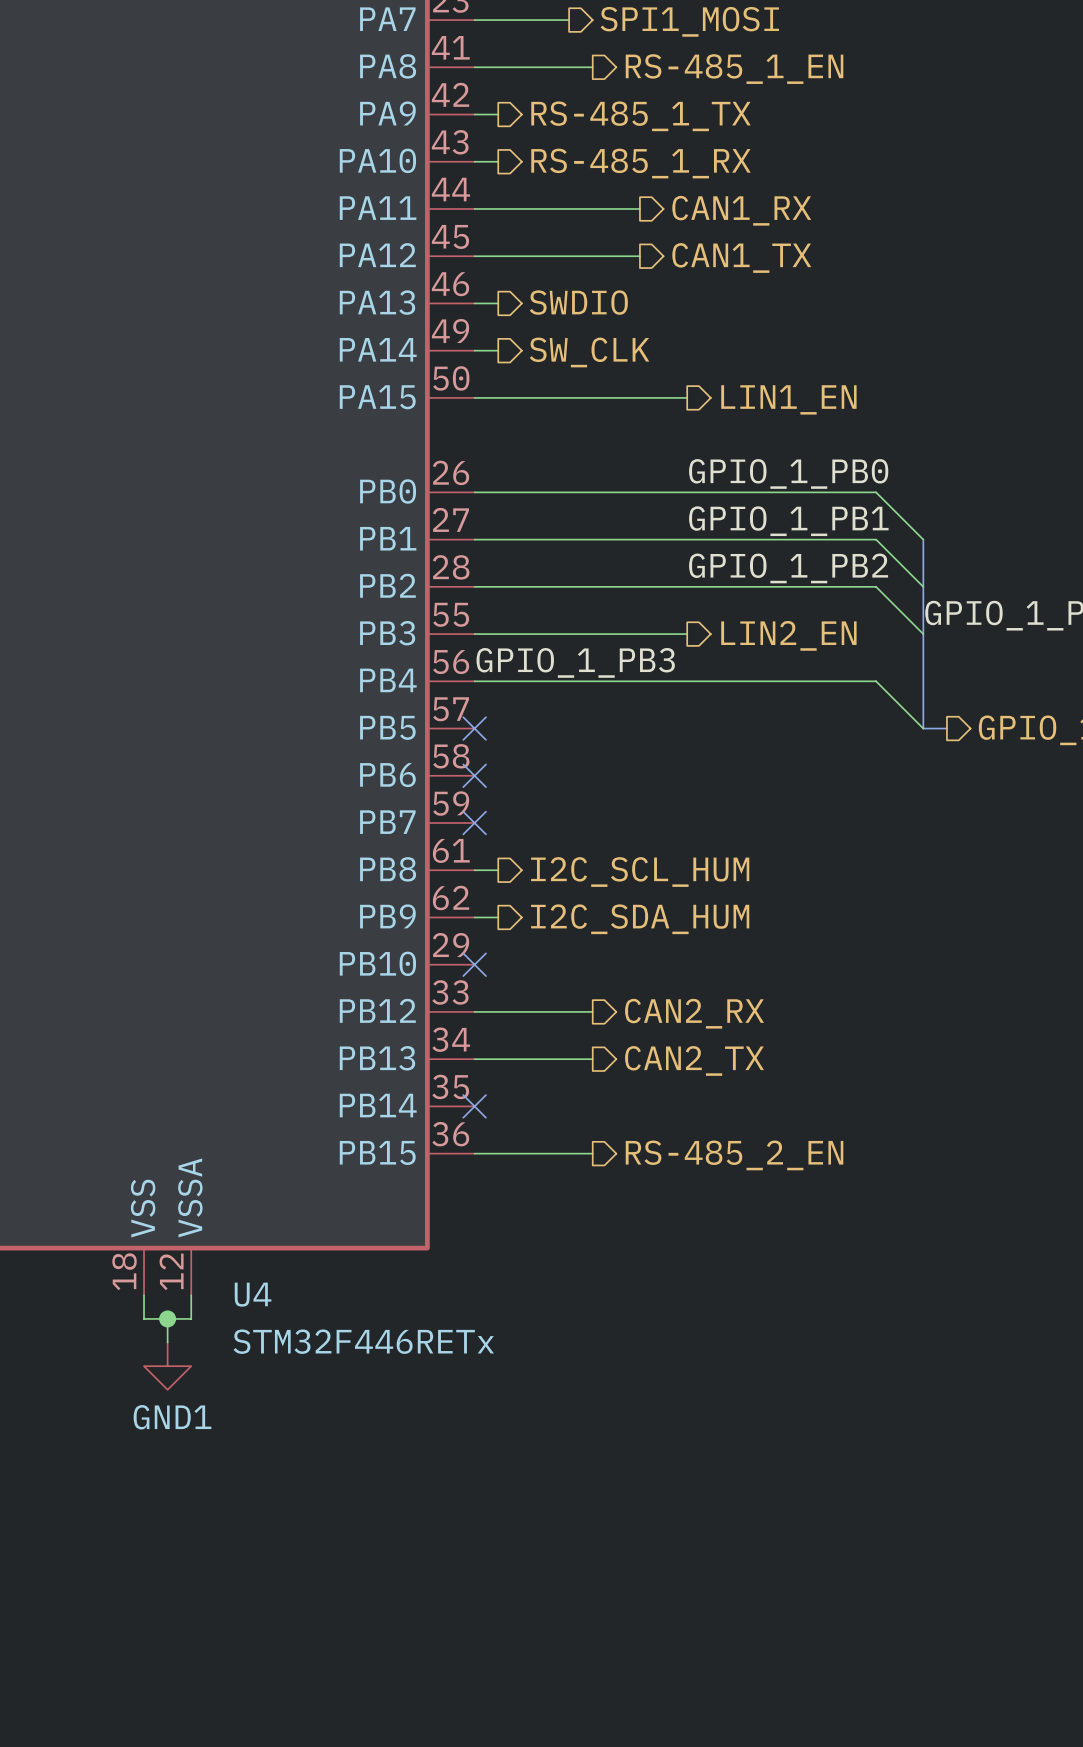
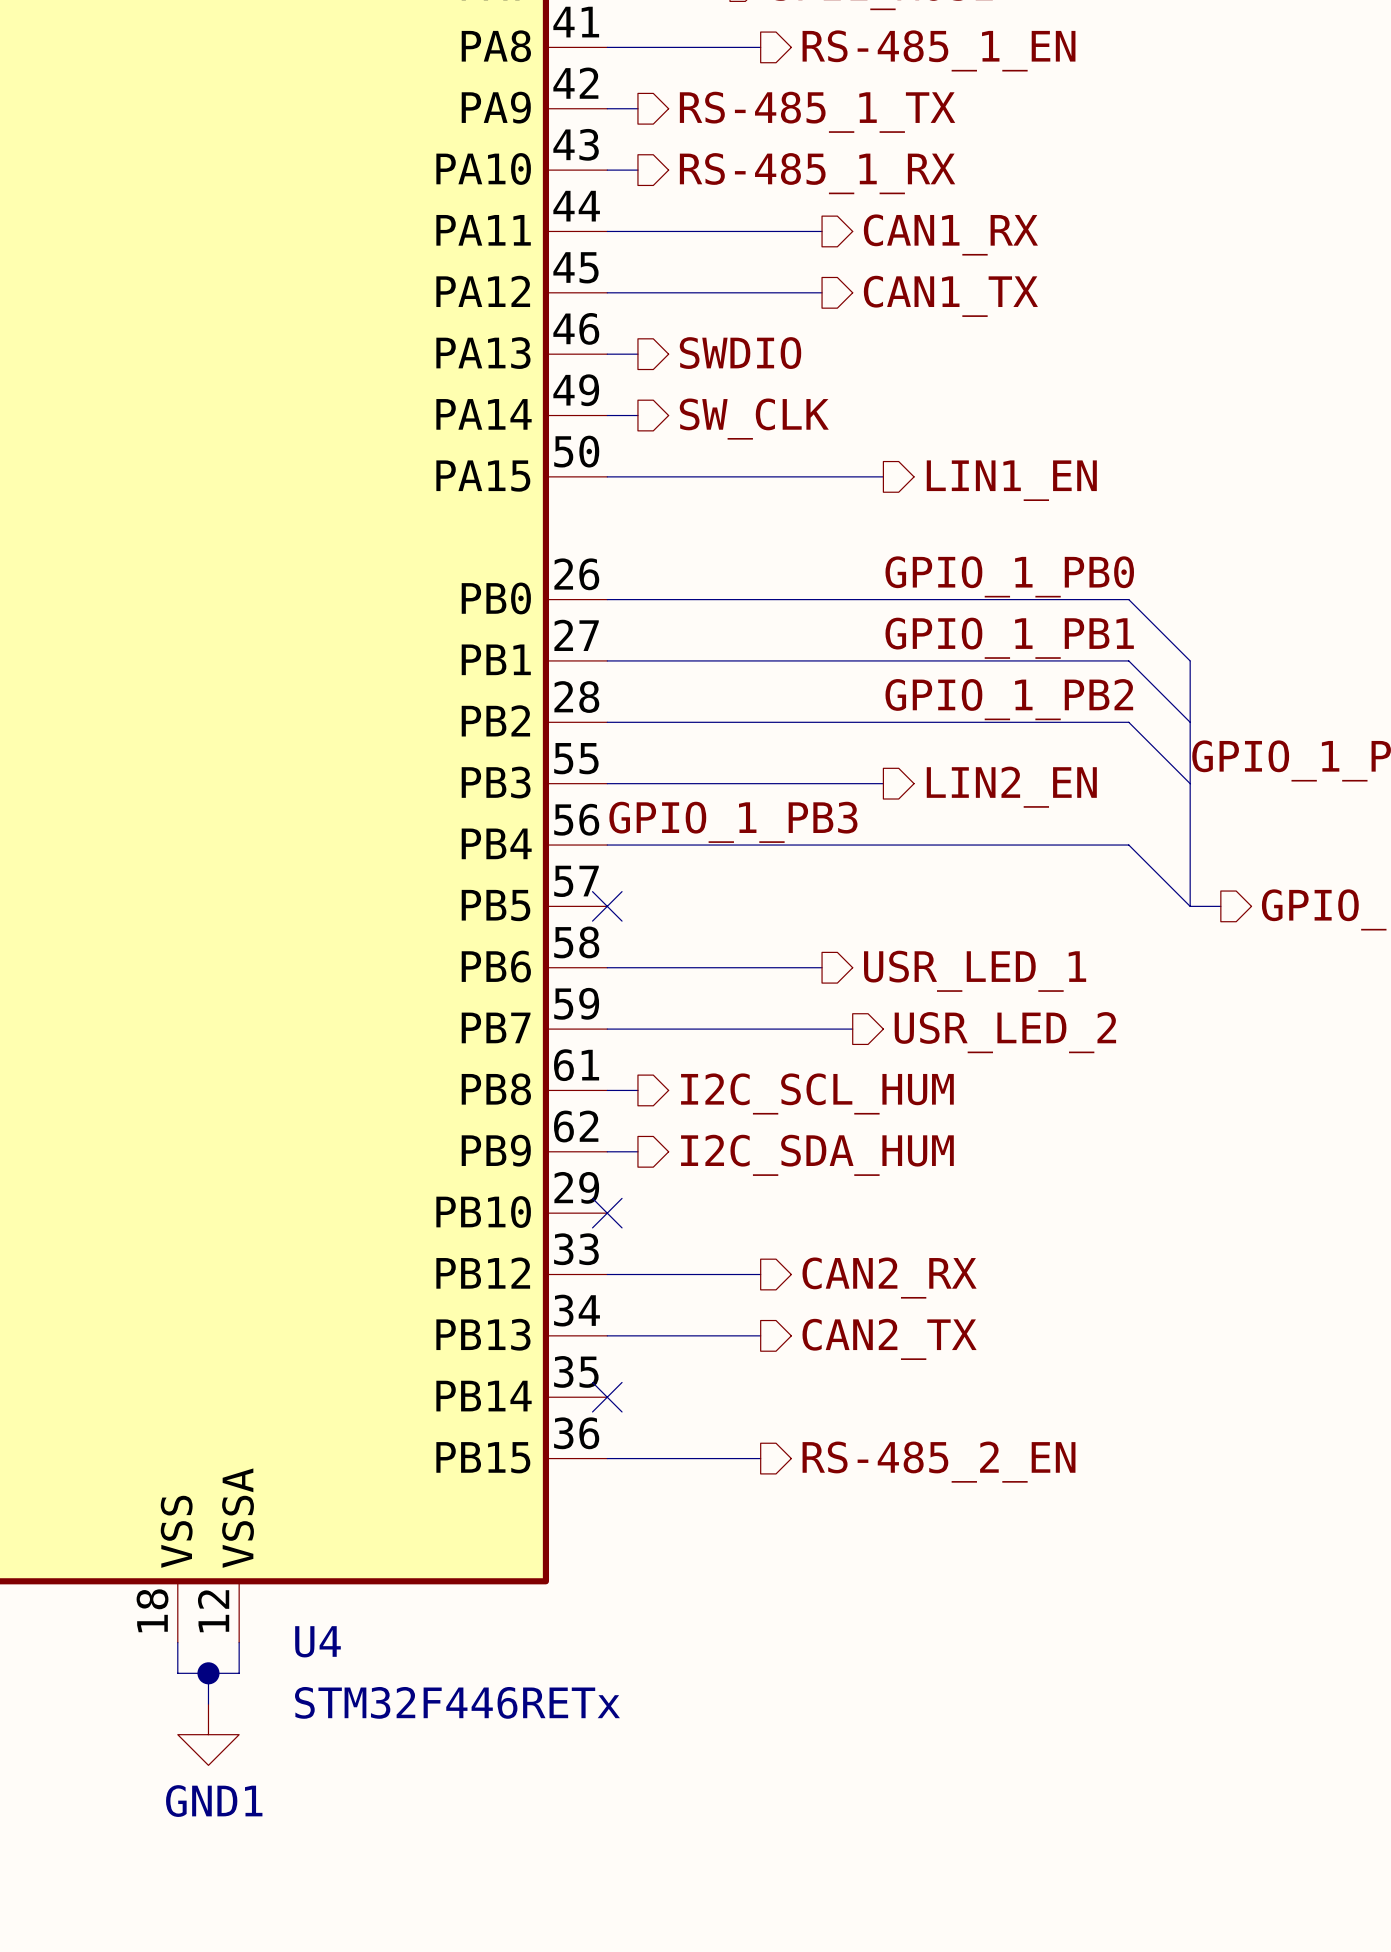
wire: none -> (607, 967) (822, 967)
no-connect mark: (474, 775) -> none
hierarchical label: none -> USR_LED_1 (975, 971)
wire: none -> (607, 1029) (852, 1029)
no-connect mark: (474, 823) -> none
hierarchical label: none -> USR_LED_2 (1005, 1032)

